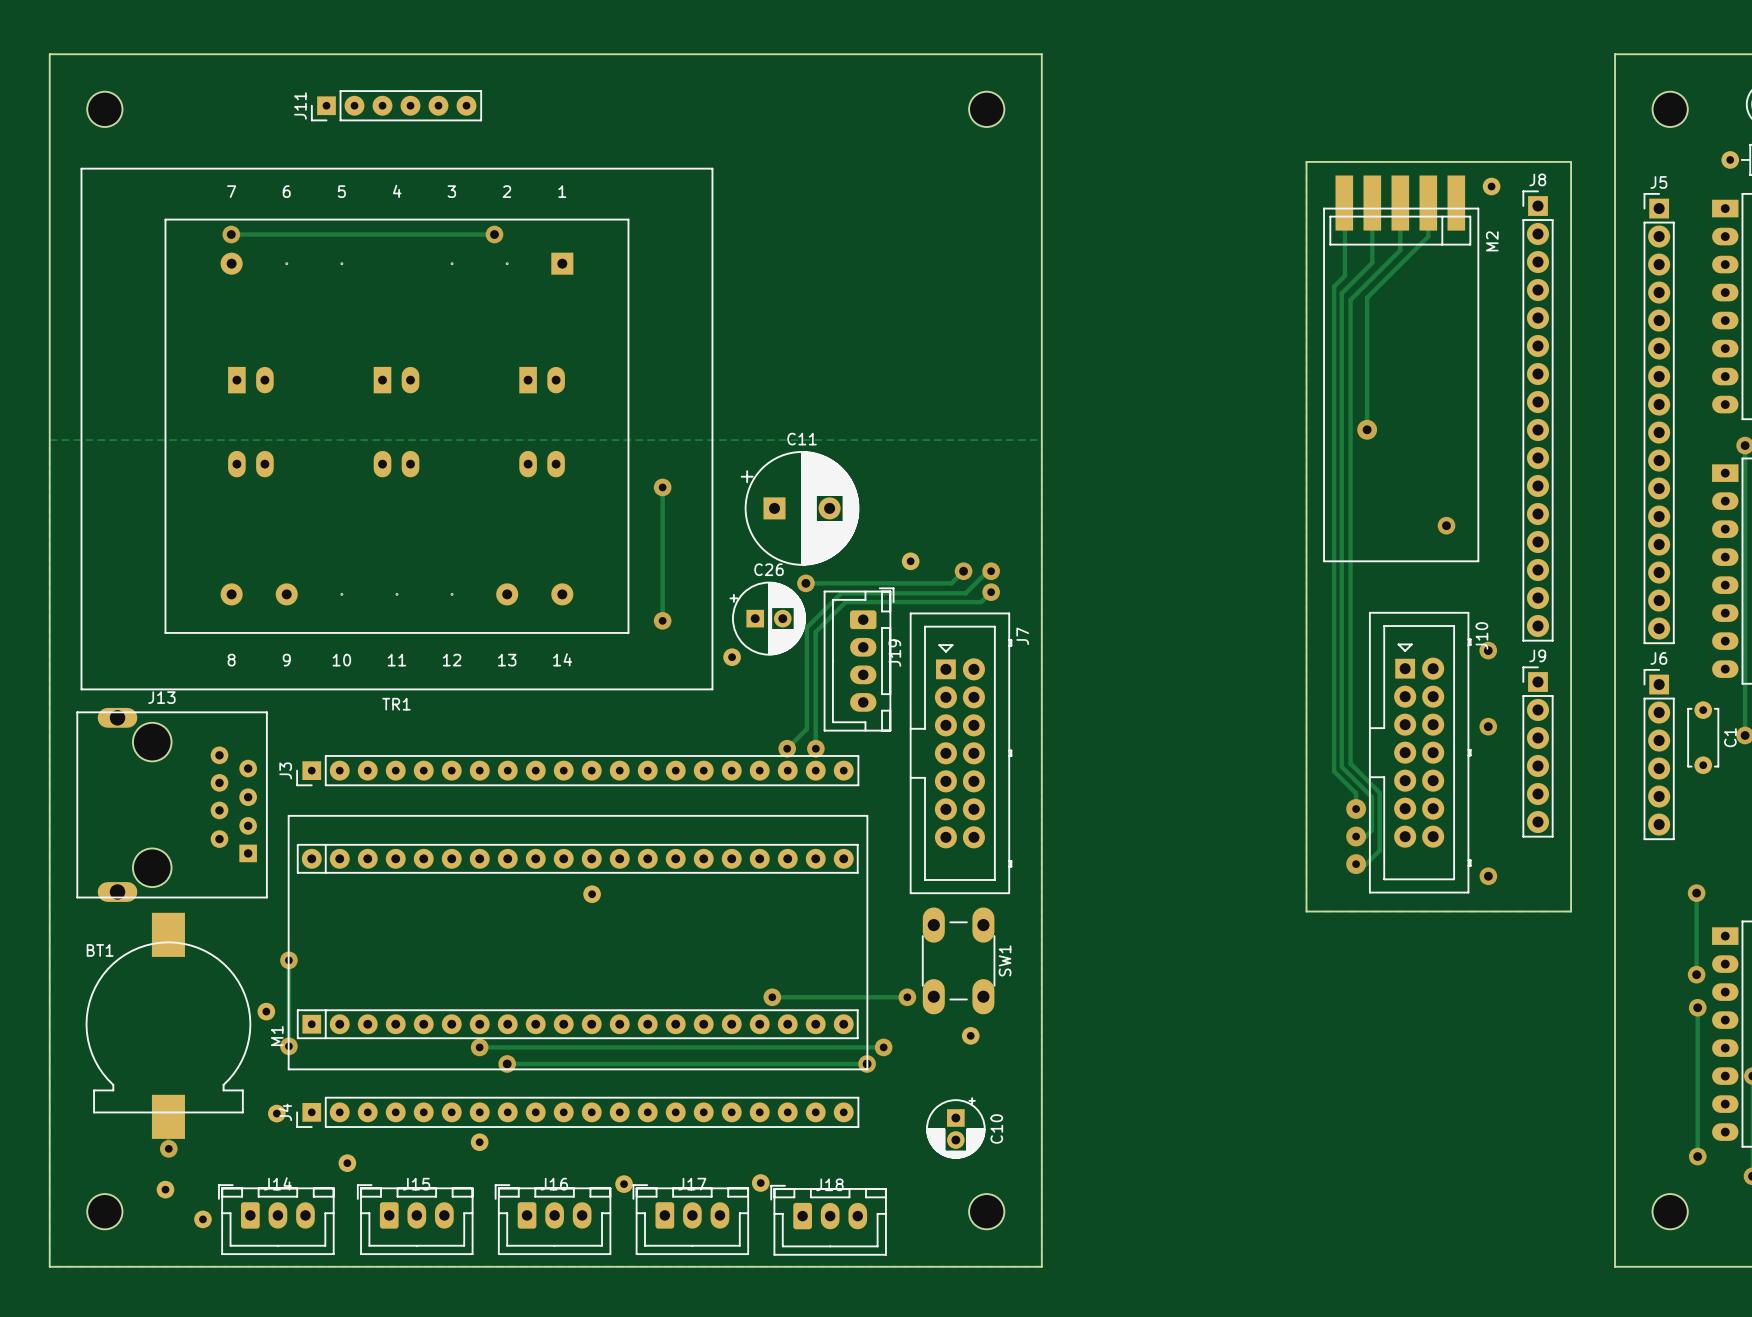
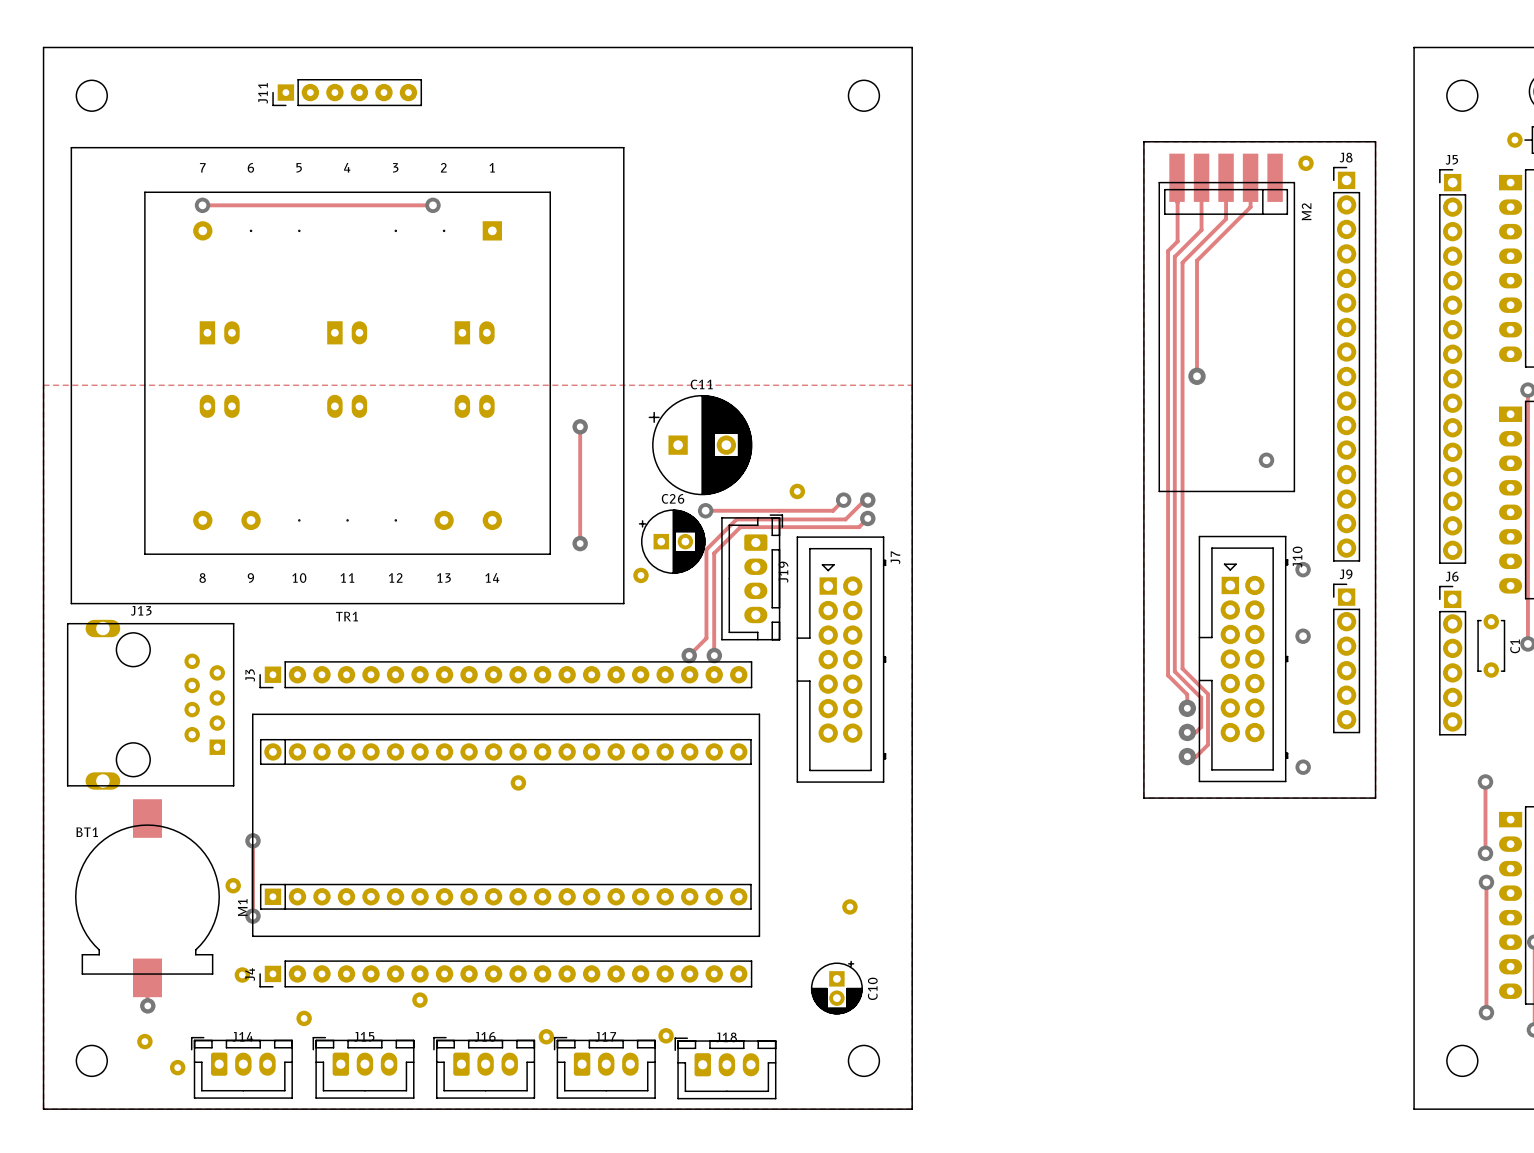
SW1: (958, 960) -> none
track: (772, 997) (907, 997) -> none
via: (772, 997) -> none
via: (907, 997) -> none
track: (479, 1047) (883, 1047) -> none
via: (479, 1047) -> none
via: (883, 1047) -> none
track: (507, 1063) (867, 1063) -> none
via: (507, 1063) -> none
via: (867, 1063) -> none

